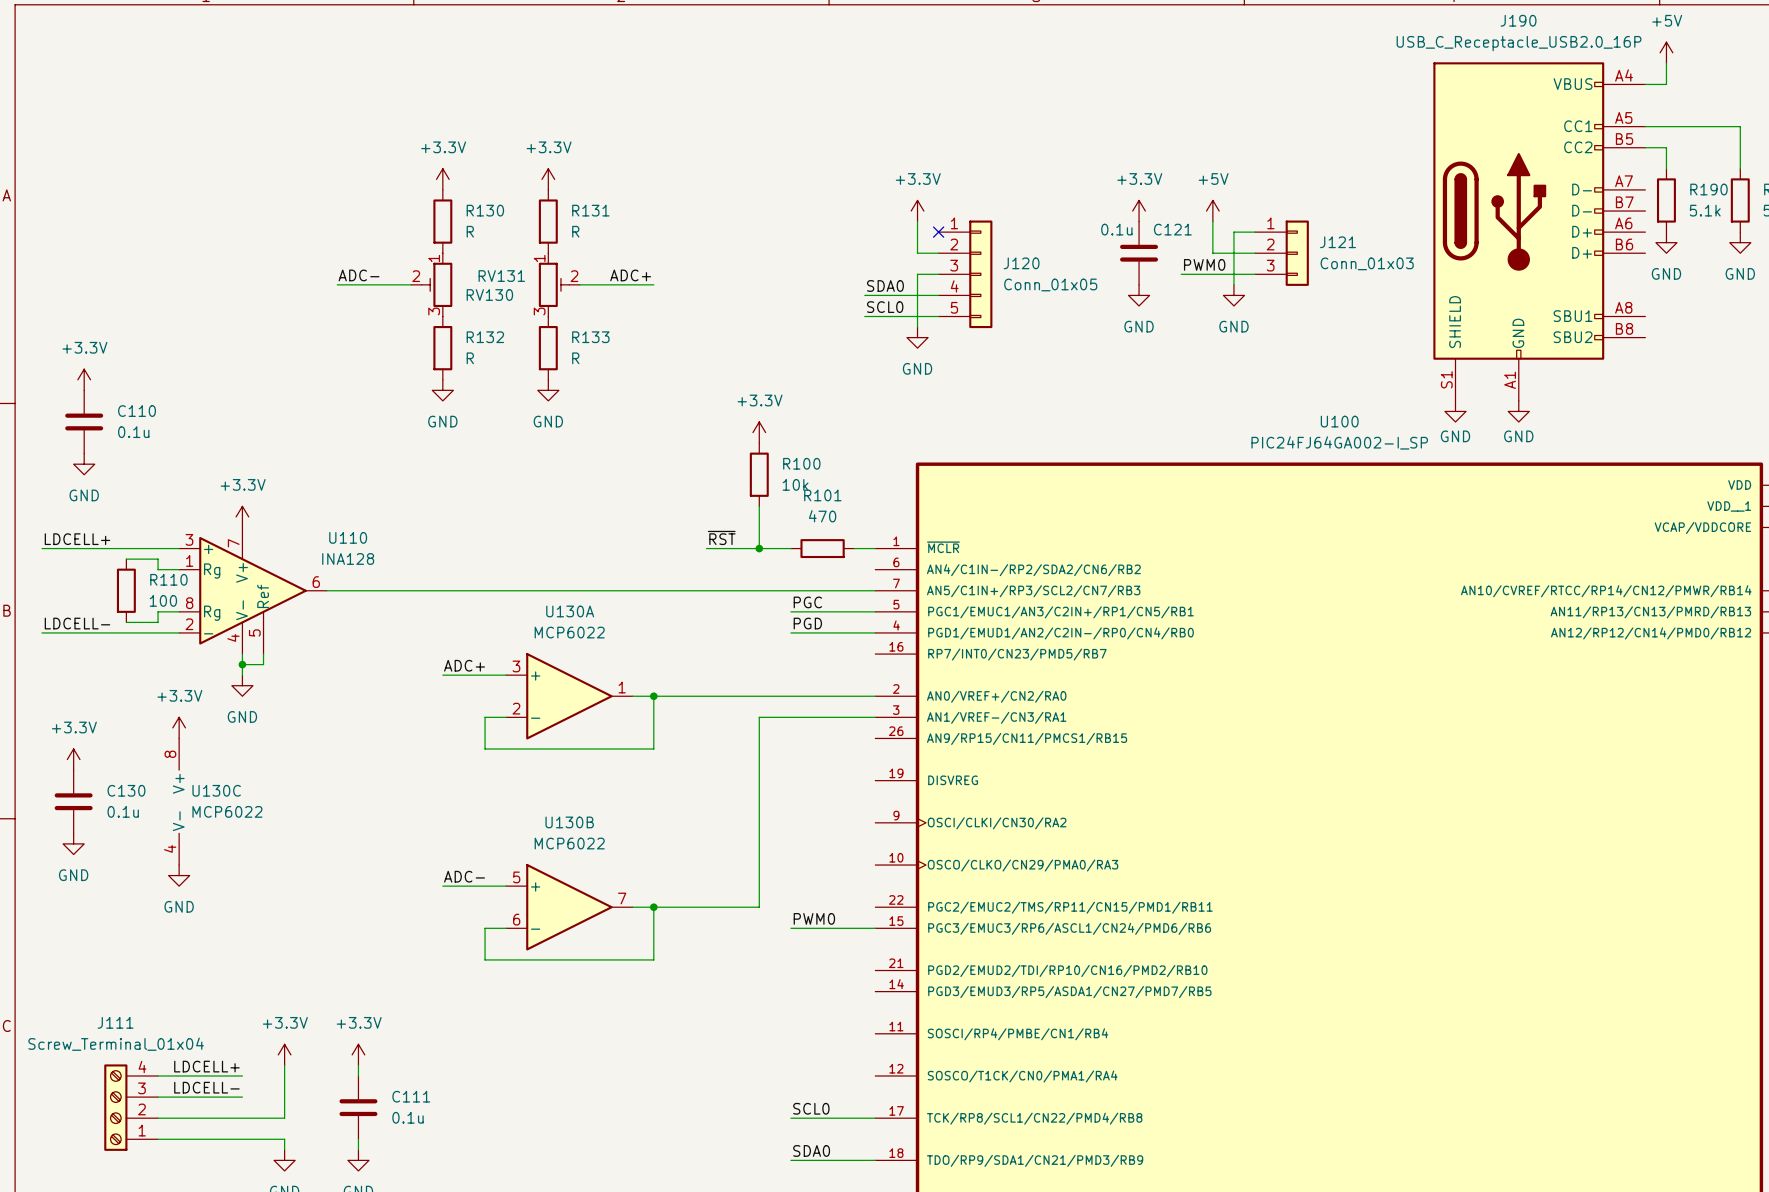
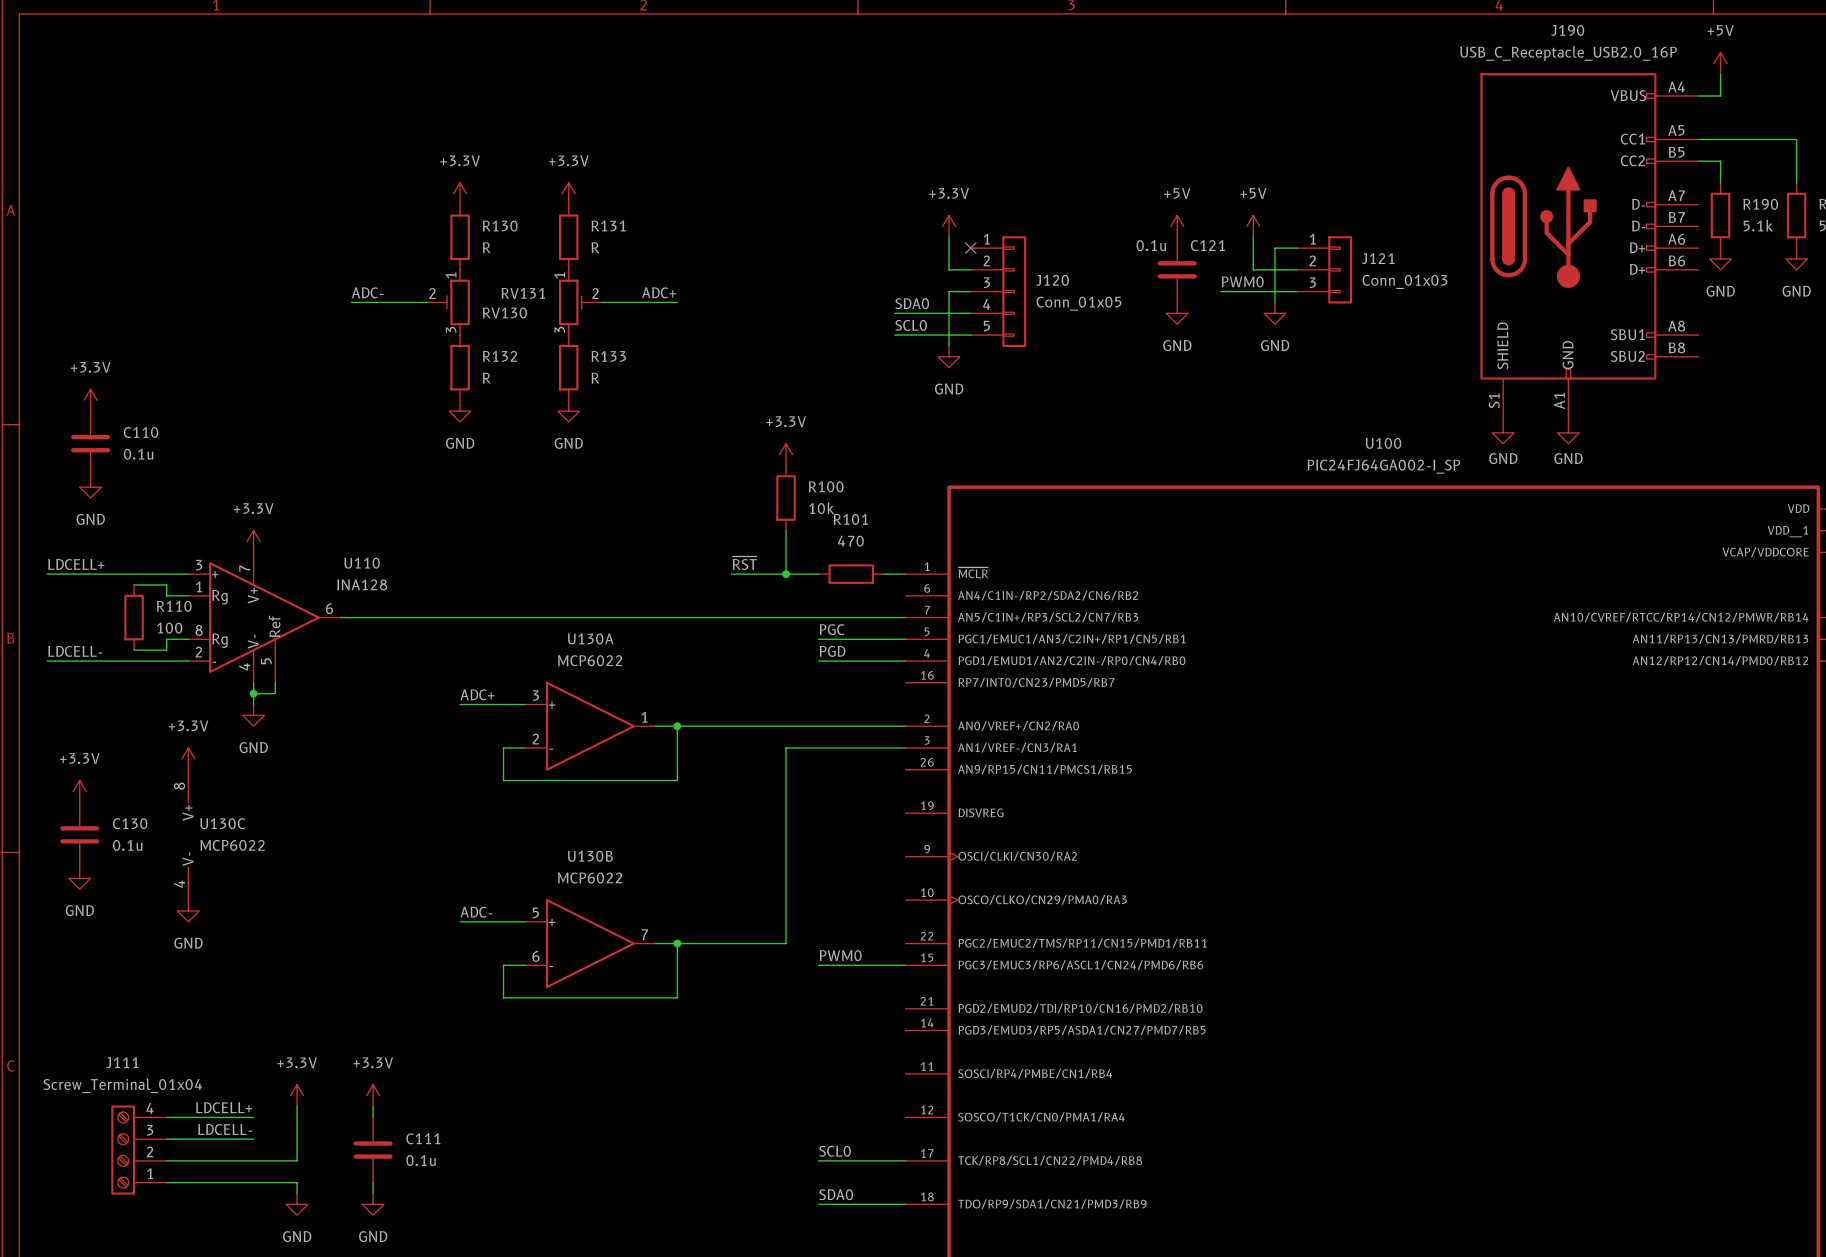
power symbol: +3.3V (1139, 211) -> +5V (1177, 226)

